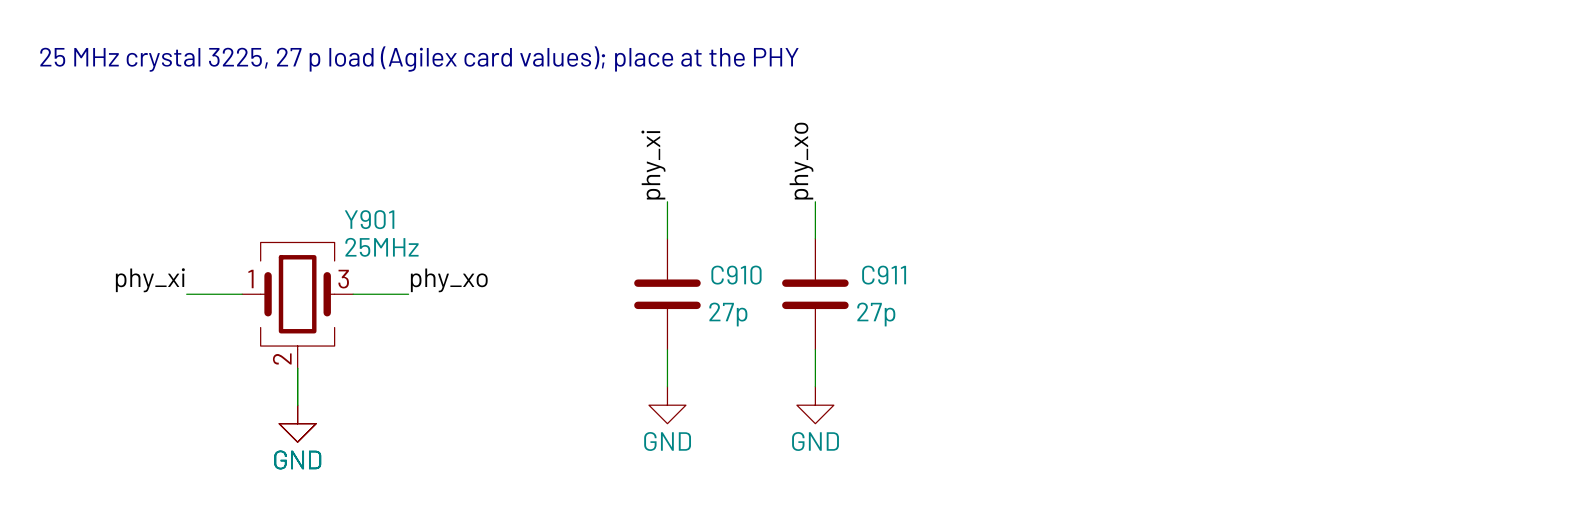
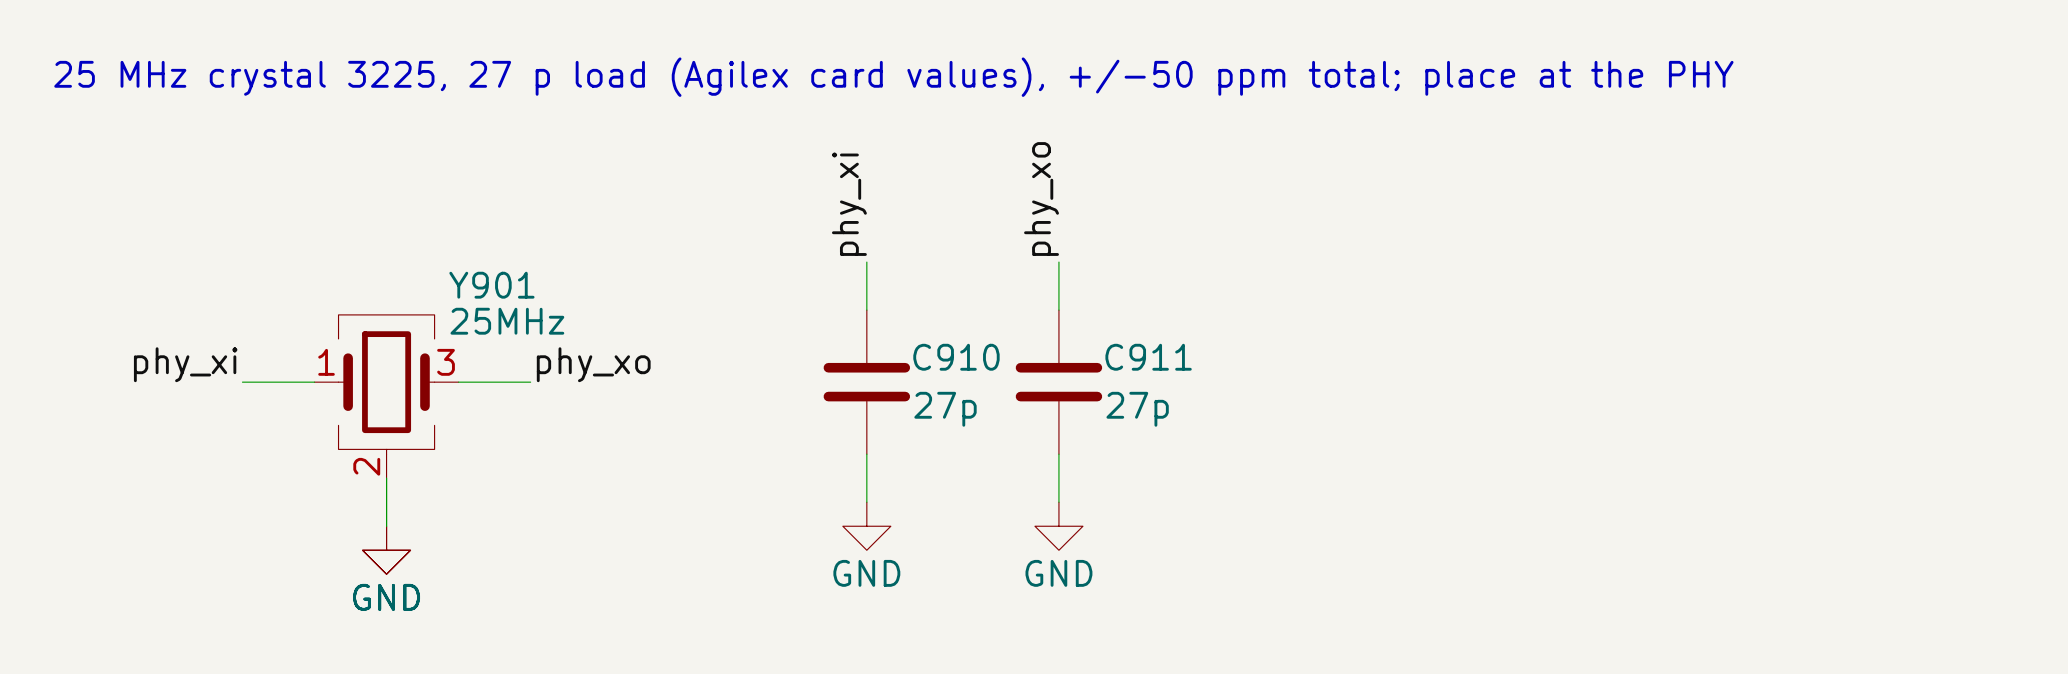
text: 25 MHz crystal 3225, 27 p load (Agilex card values); place at the PHY (419, 59) -> 25 MHz crystal 3225, 27 p load (Agilex card values), +/-50 ppm total; place at the PHY (893, 77)

